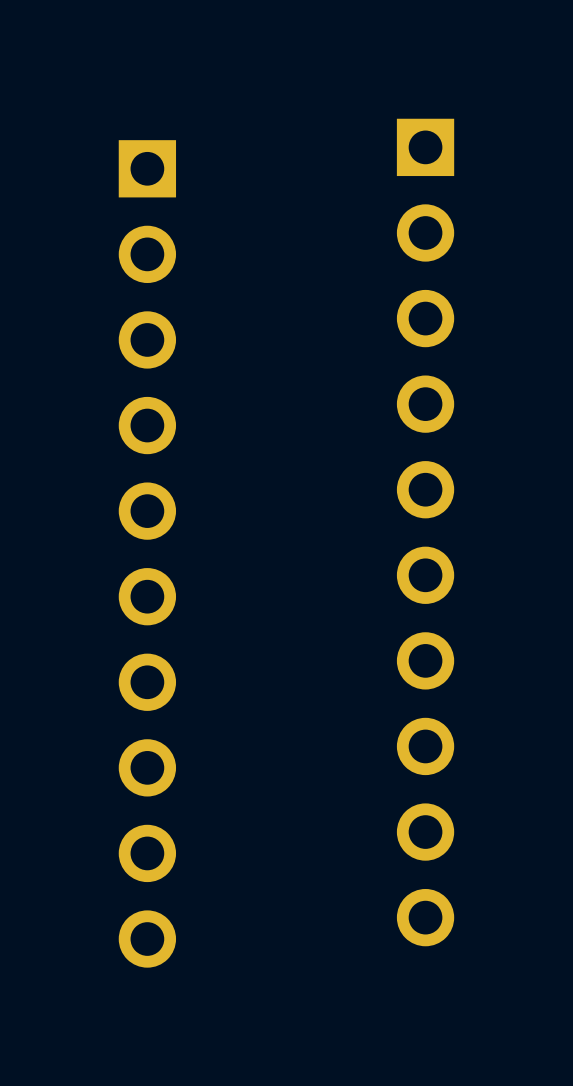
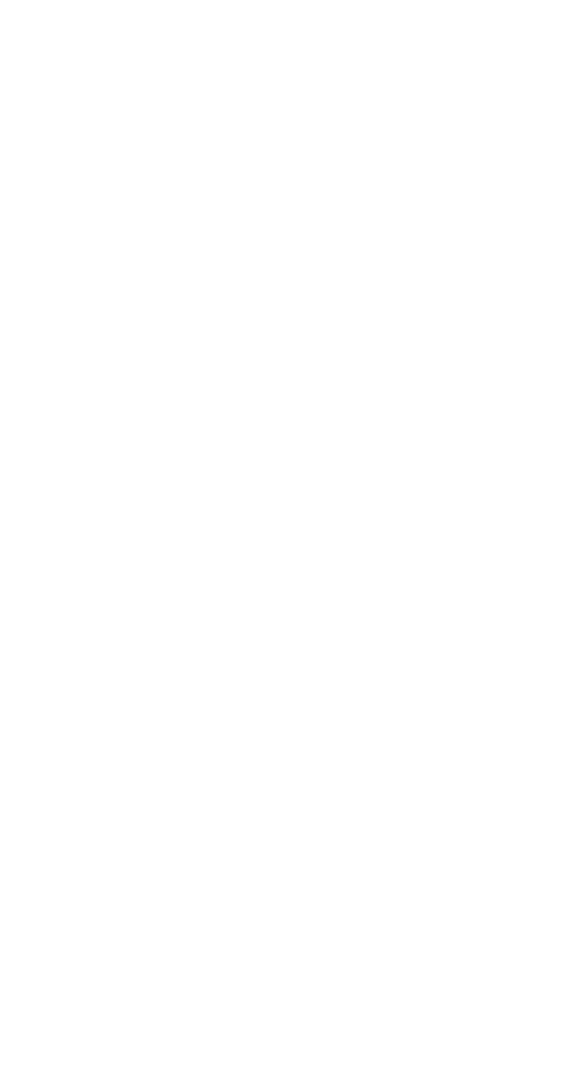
part: (425, 532) -> none
part: (147, 553) -> none

